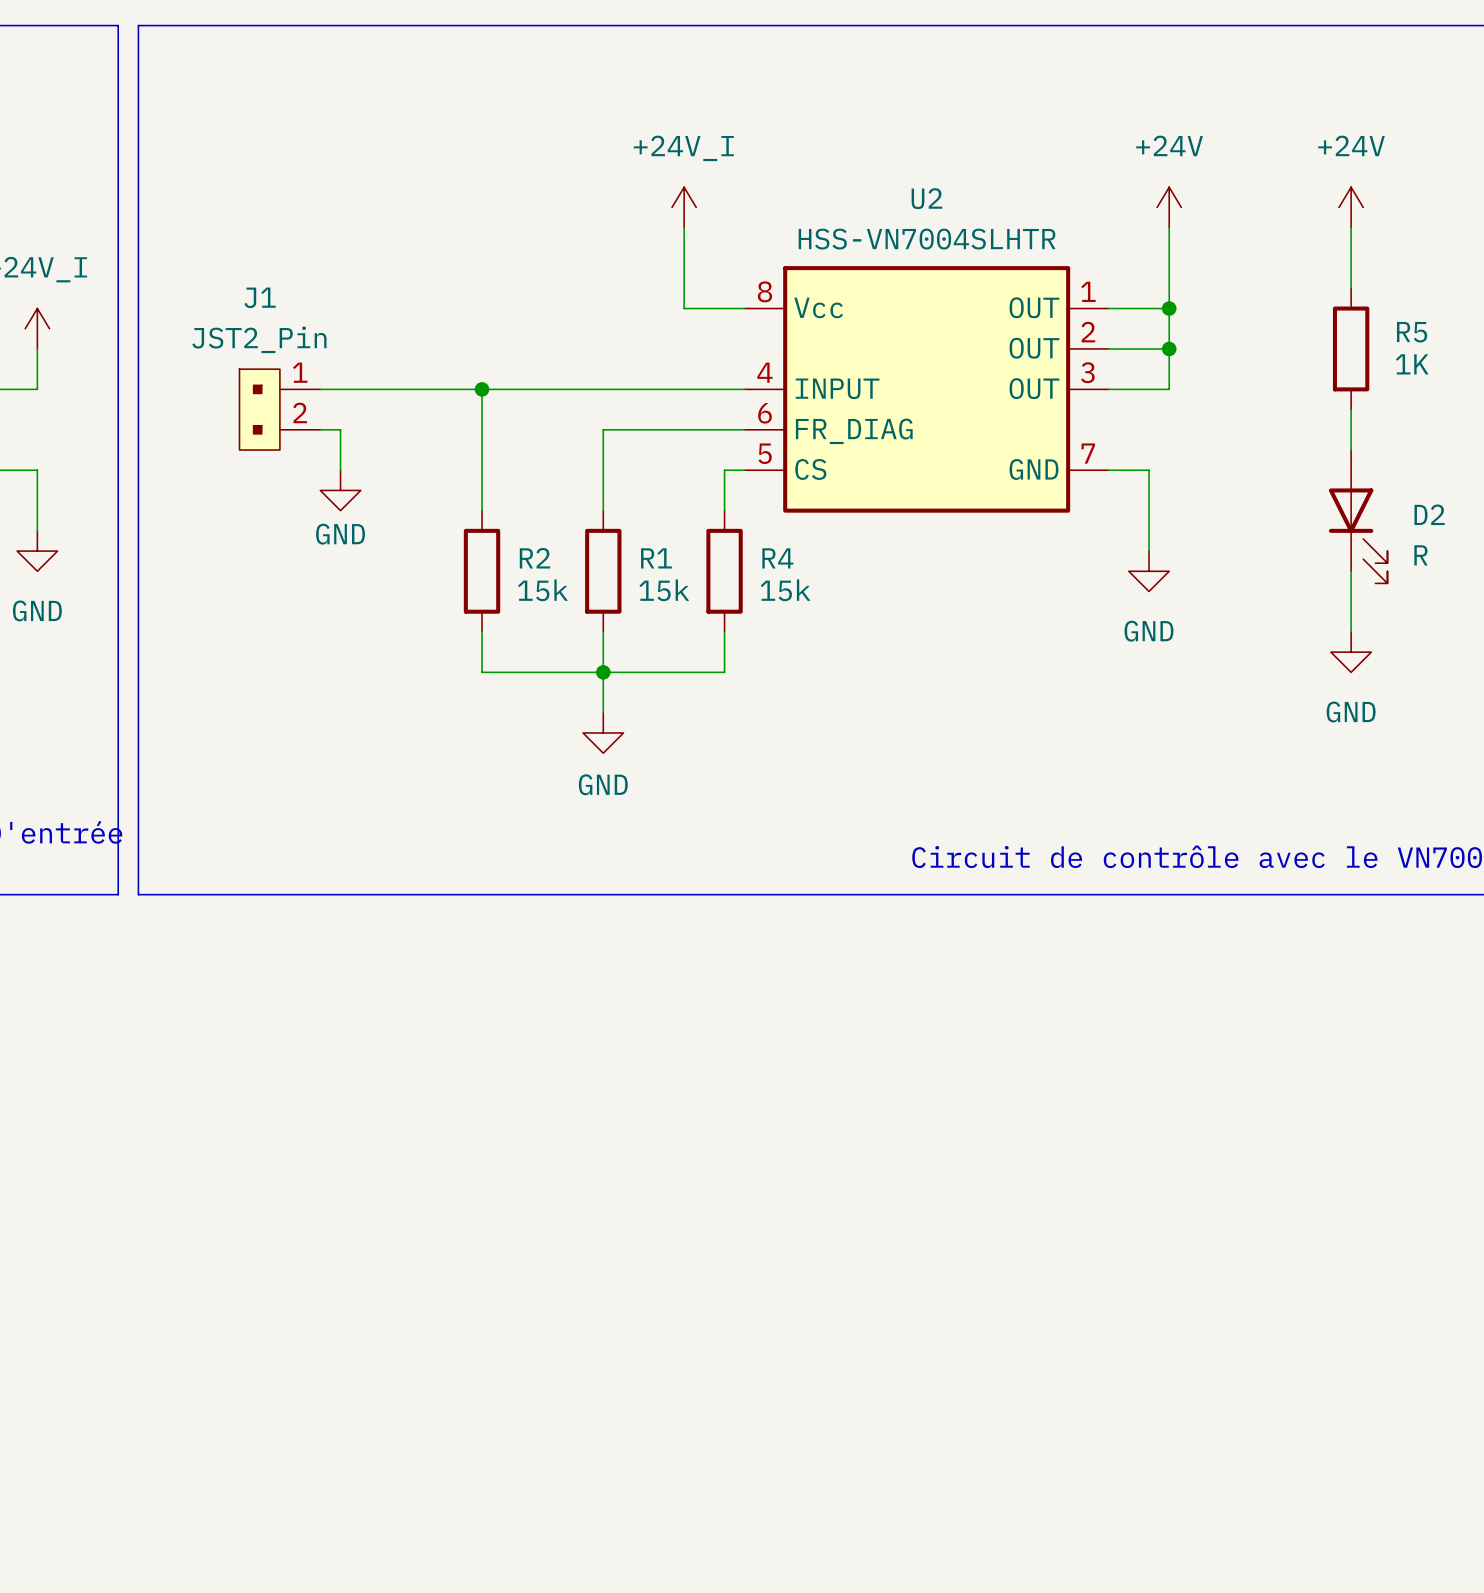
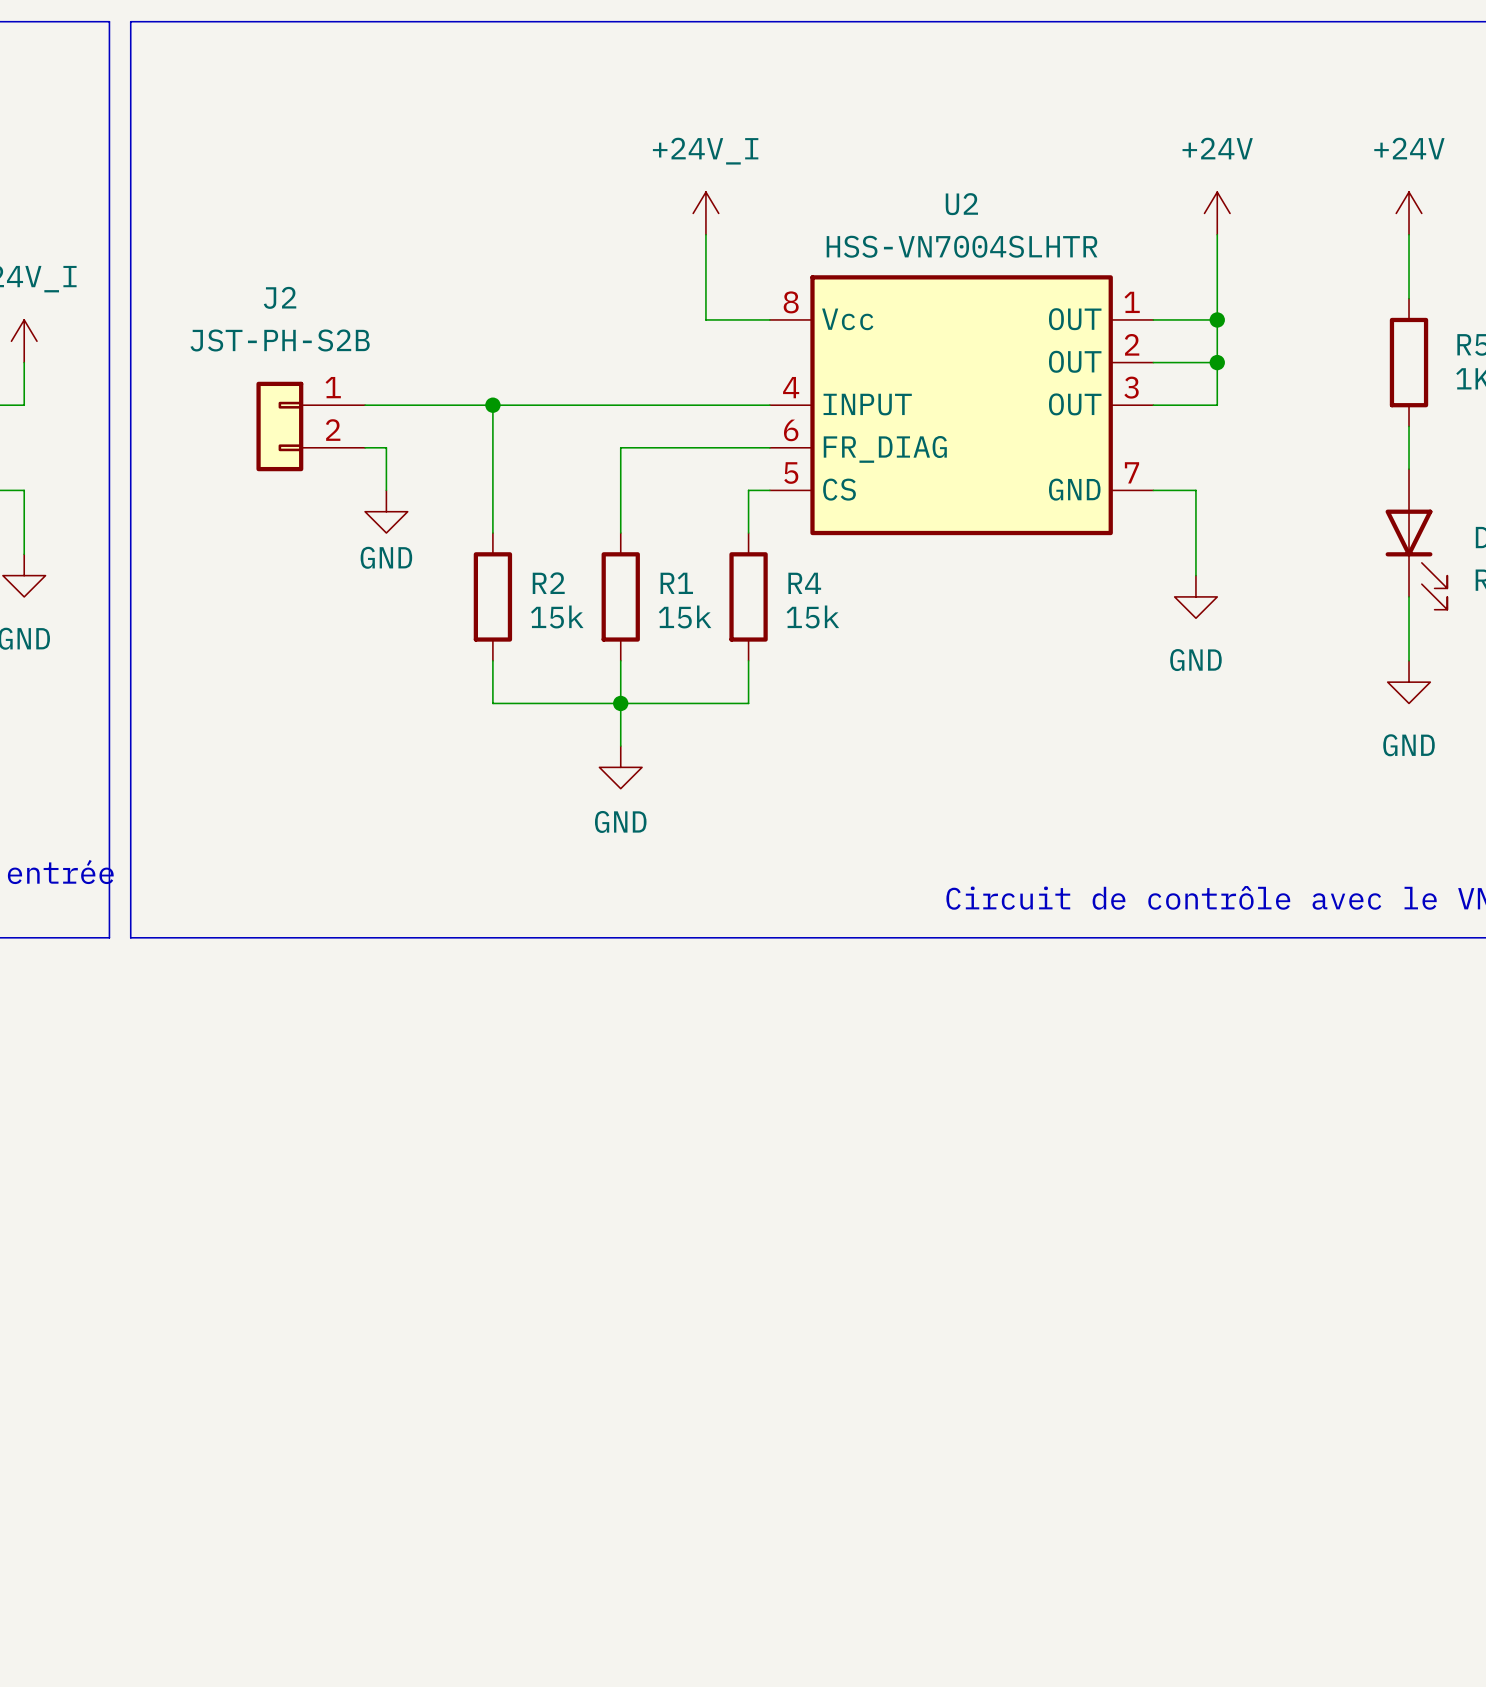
J1: JST2_Pin (279, 409) -> none
J2: none -> JST-PH-S2B (310, 426)
wire: (320, 429) (340, 429) (340, 470) -> (365, 447) (386, 447) (386, 490)
power symbol position: GND (340, 490) -> GND (386, 511)

